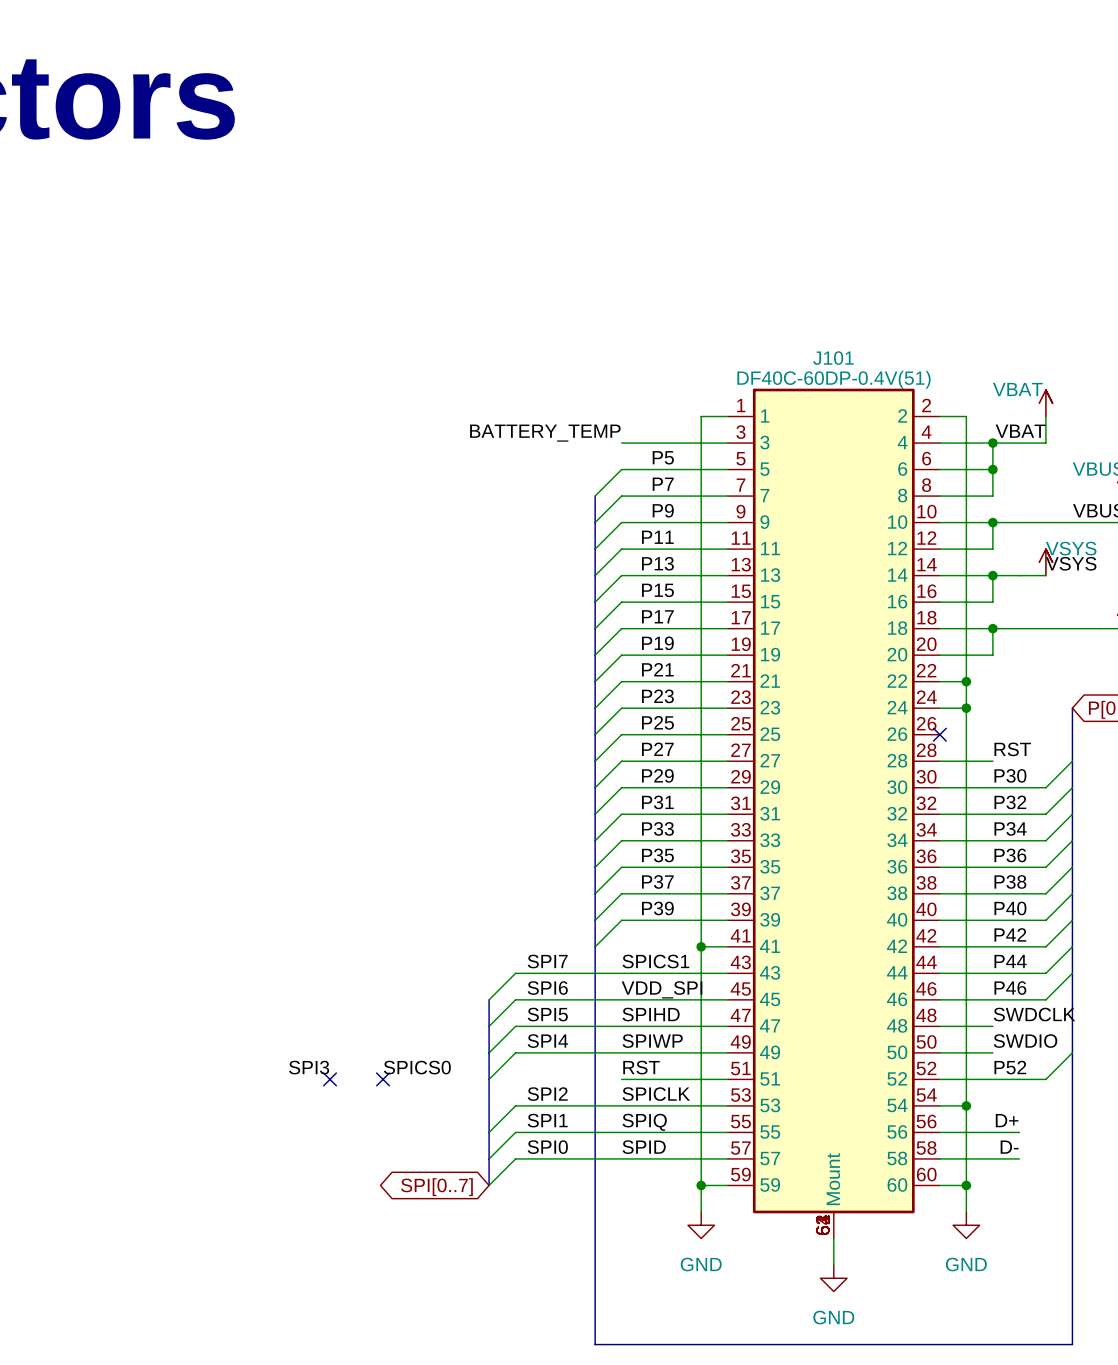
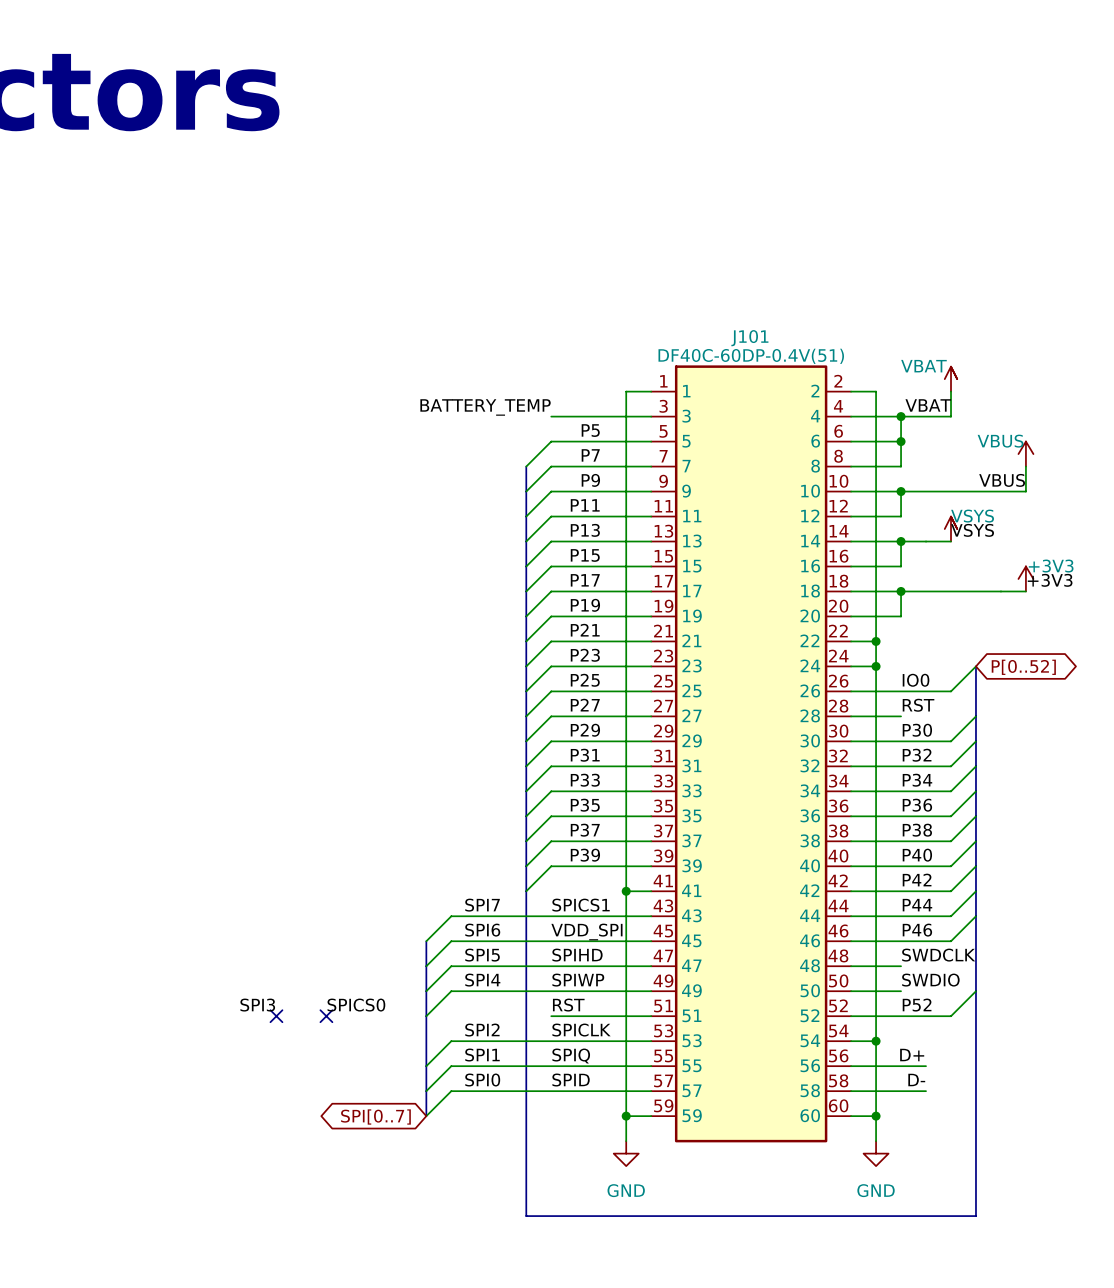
J101 symbol: [727, 388, 940, 1239] -> [651, 365, 852, 1143]
wire: none -> (975, 666) (951, 691) (851, 691)
label: none -> IO0 (916, 680)
no-connect mark: (939, 734) -> none
wire: (833, 1238) (833, 1265) -> none
power symbol: GND (833, 1278) -> none
bus: (595, 1291) (595, 1344) (1072, 1344) (1072, 1291) -> (526, 1216) (975, 1216)

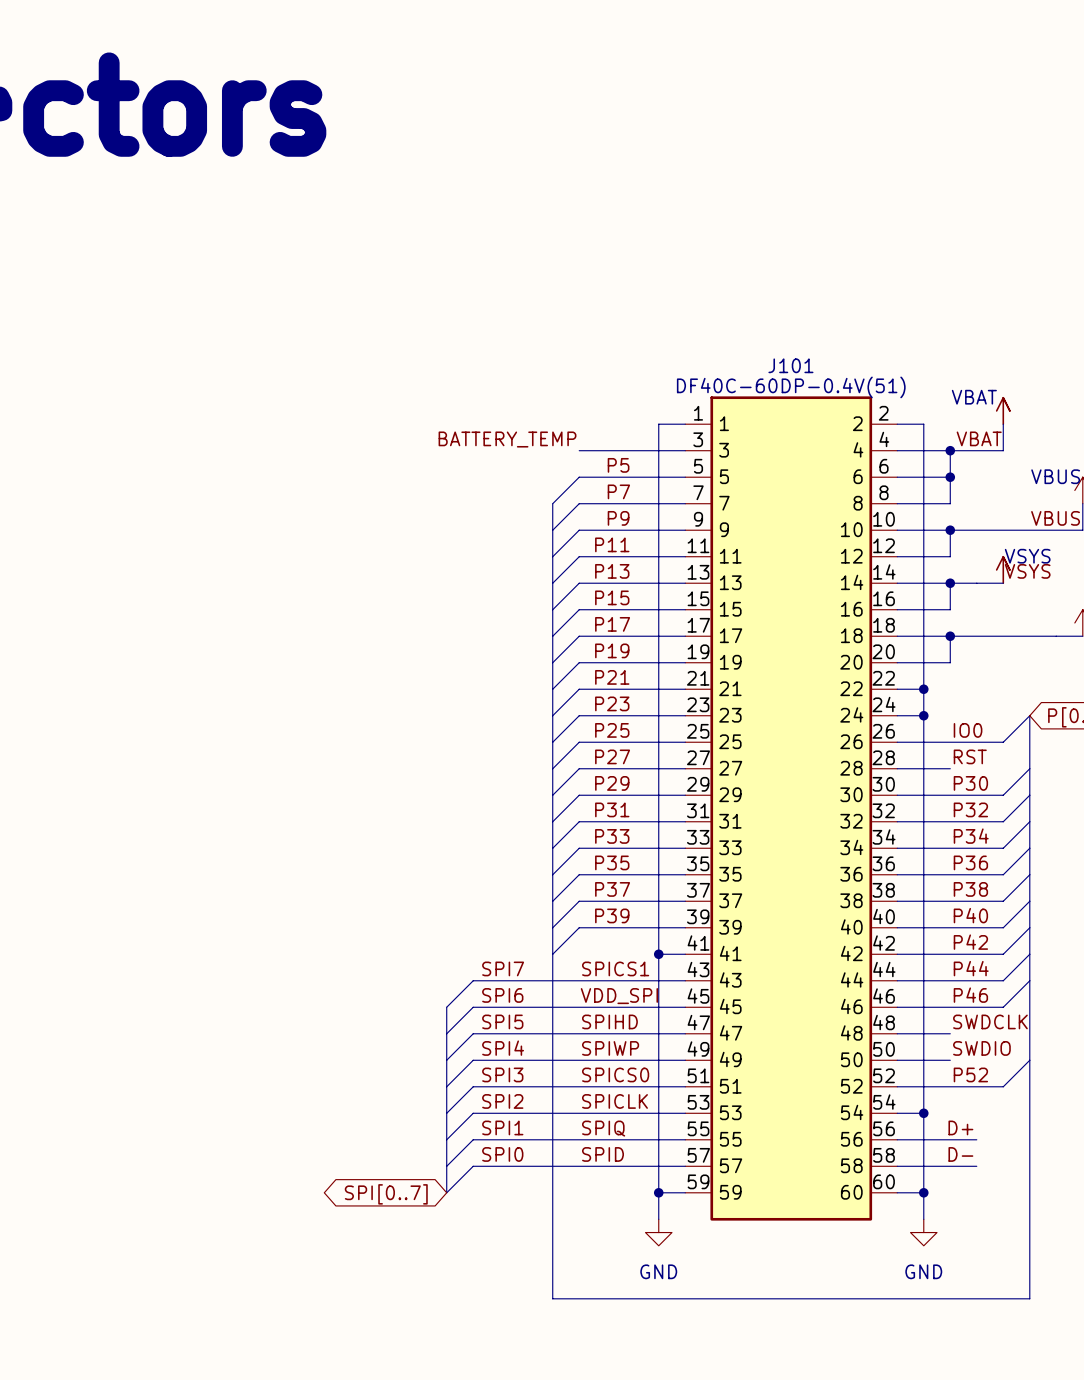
label position: SPI3 (257, 1005) -> SPI3 (502, 1074)
label: SPICS0 (356, 1005) -> none
label: RST (568, 1005) -> SPICS0 (615, 1074)
no-connect mark: (276, 1016) -> none
no-connect mark: (326, 1016) -> none
wire: none -> (579, 1086) (473, 1086) (446, 1113)

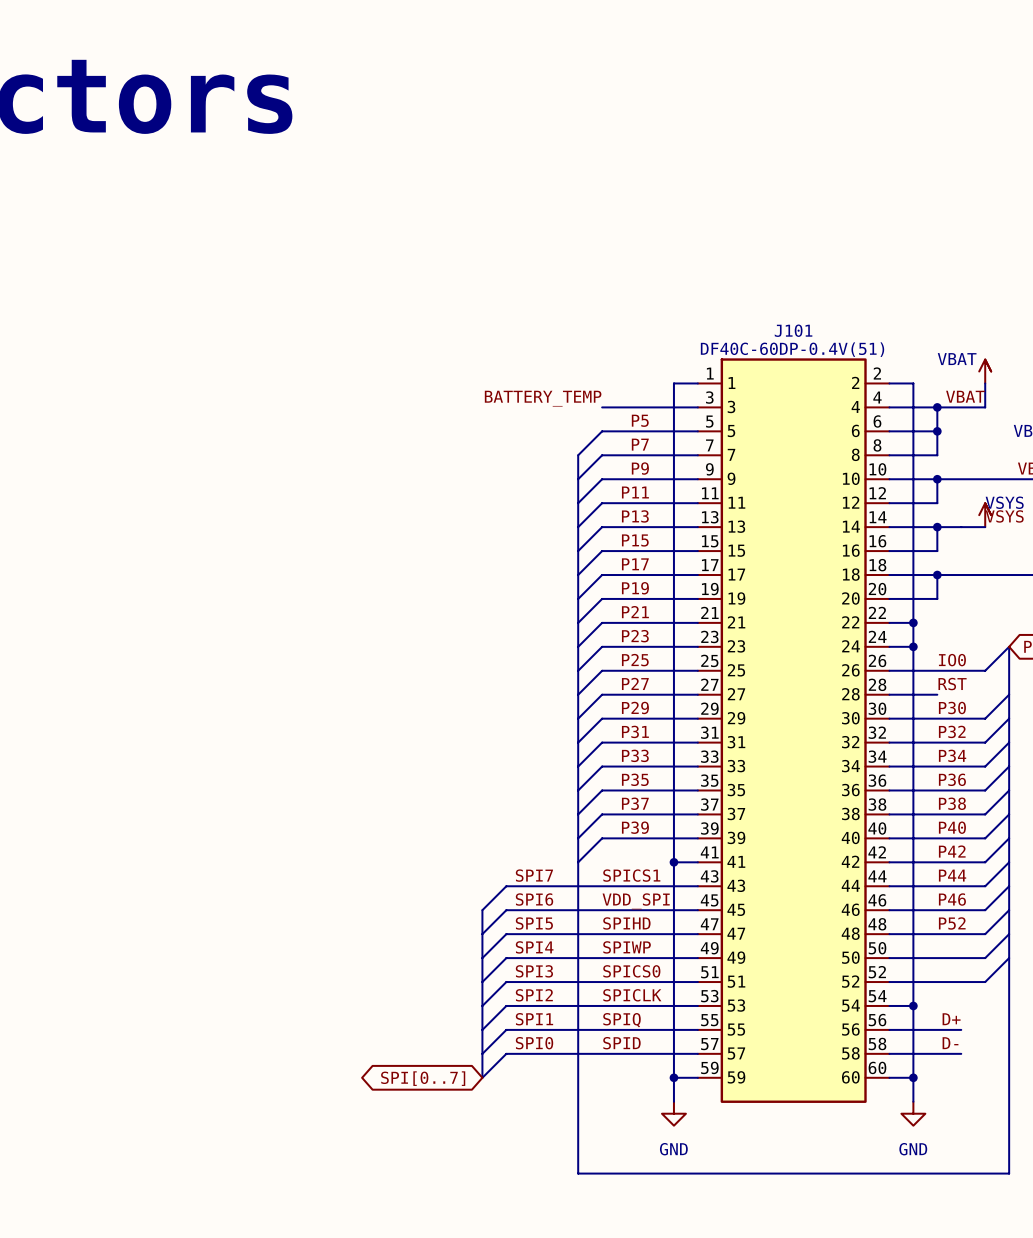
wire: none -> (1009, 910) (985, 934) (937, 934)
label: SWDCLK (990, 1021) -> P52 (952, 923)
wire: none -> (1009, 934) (985, 958) (937, 958)
label: SWDIO (981, 1048) -> none
label: P52 (970, 1074) -> none

